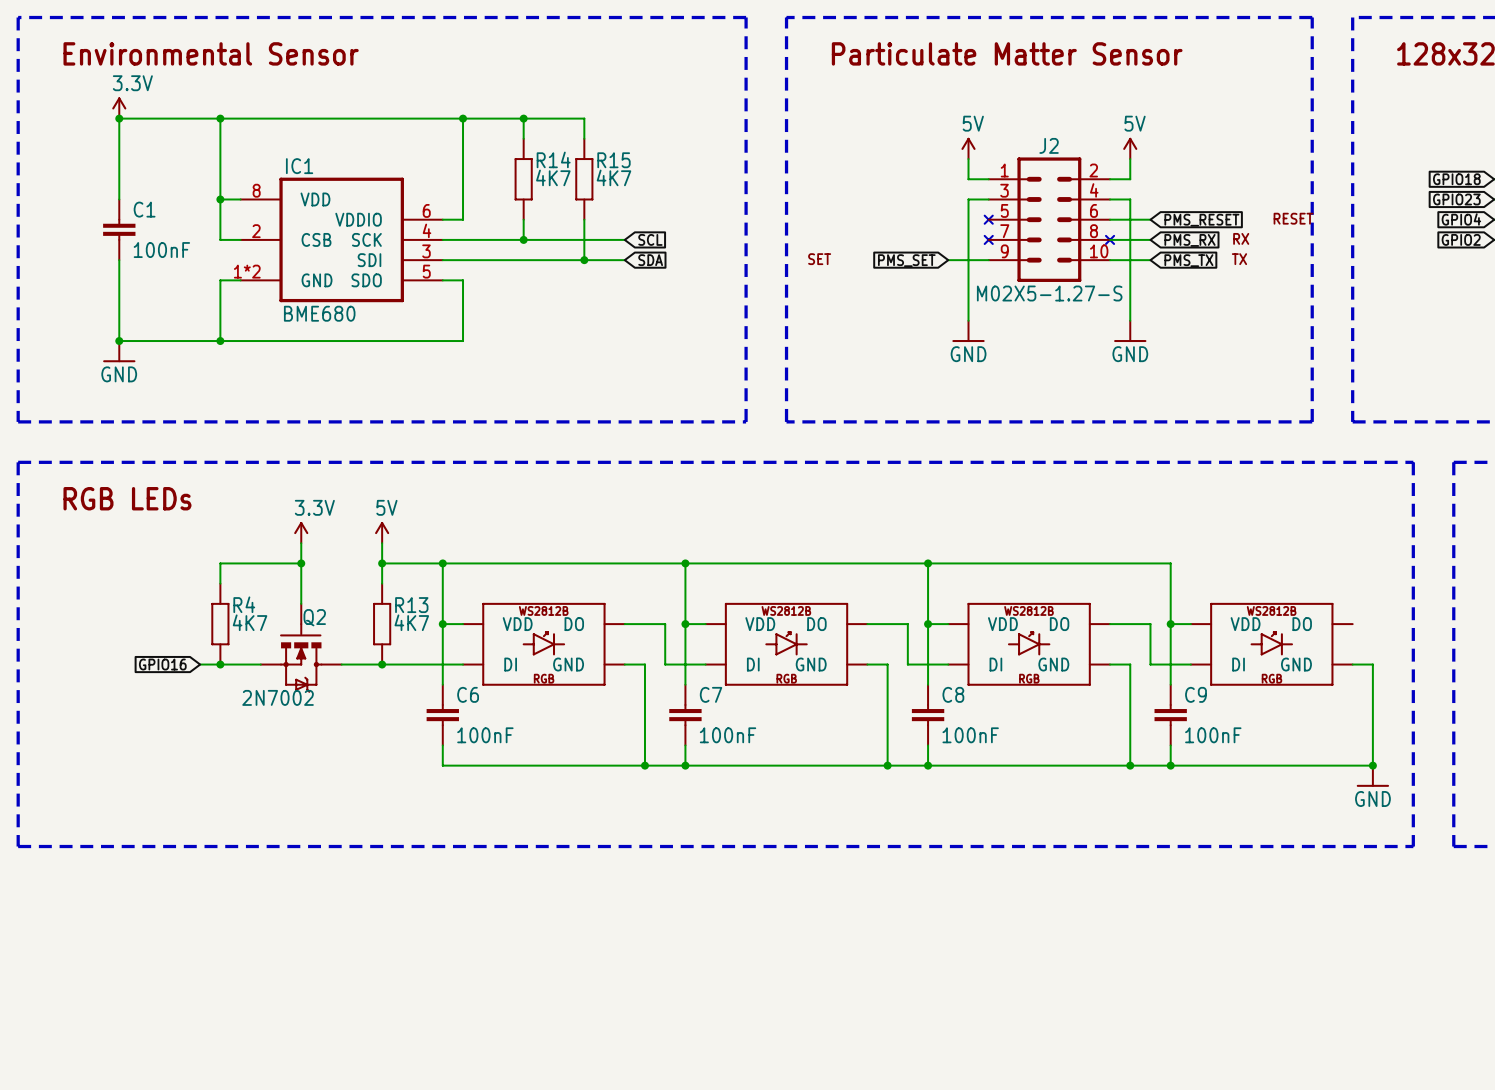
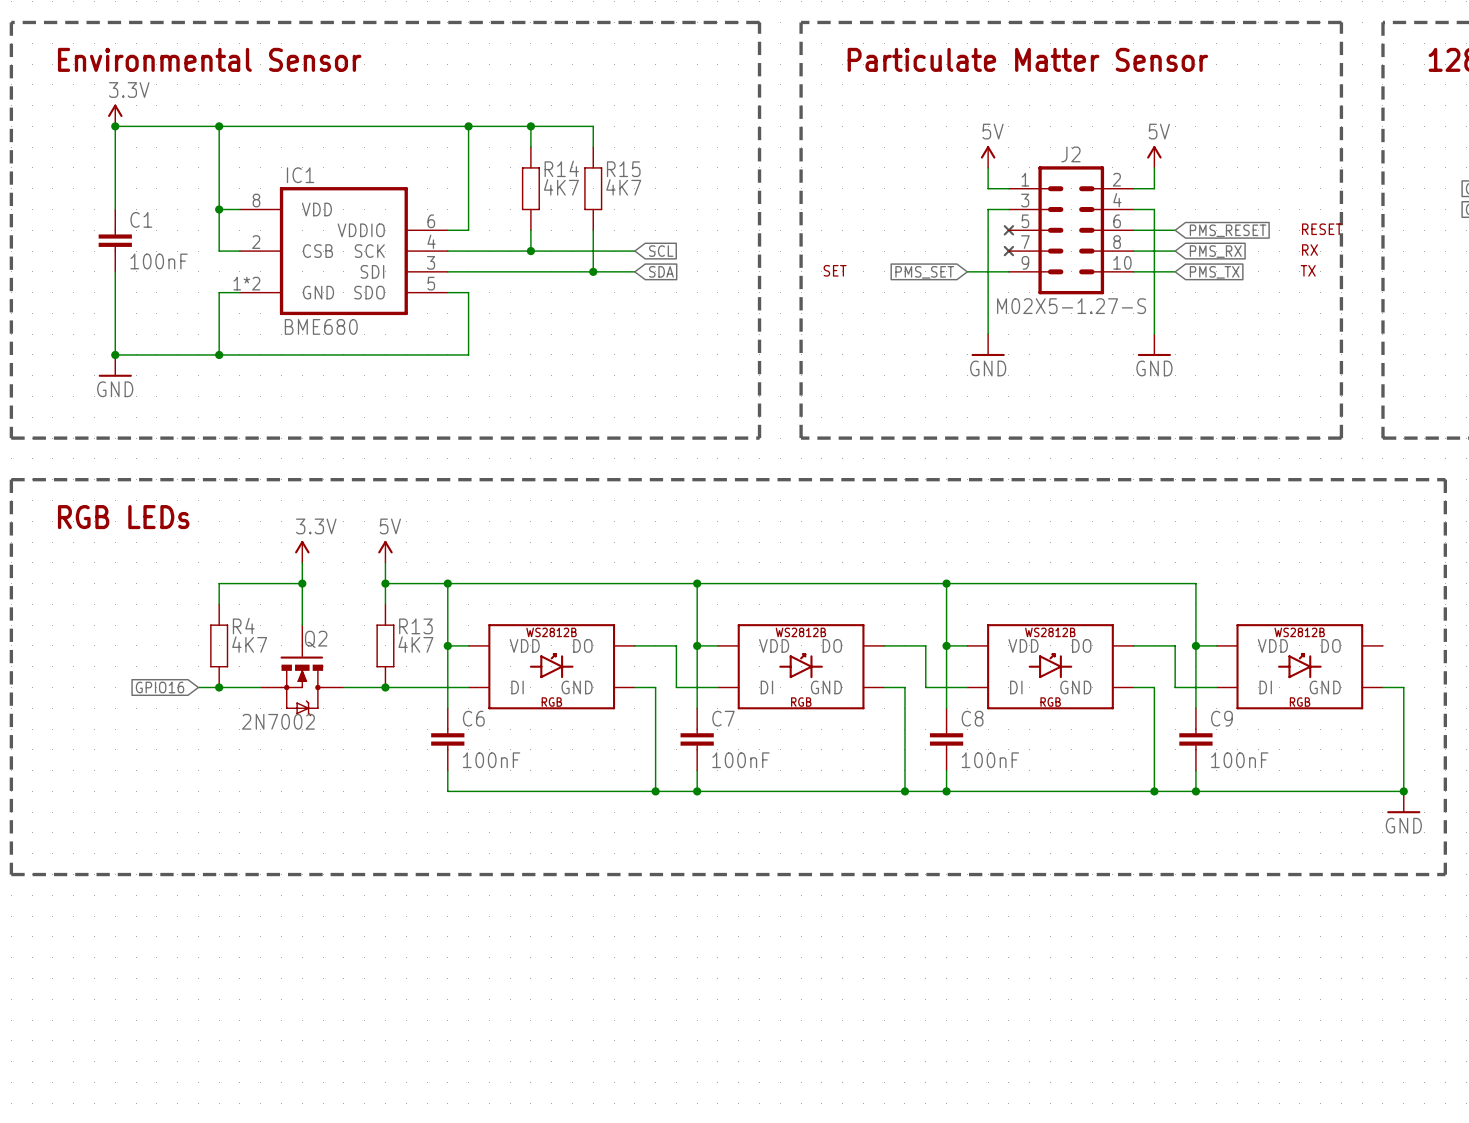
text position: RX (1241, 238) -> RX (1309, 250)
part: (1110, 239) -> none
text position: TX (1239, 259) -> TX (1308, 270)

